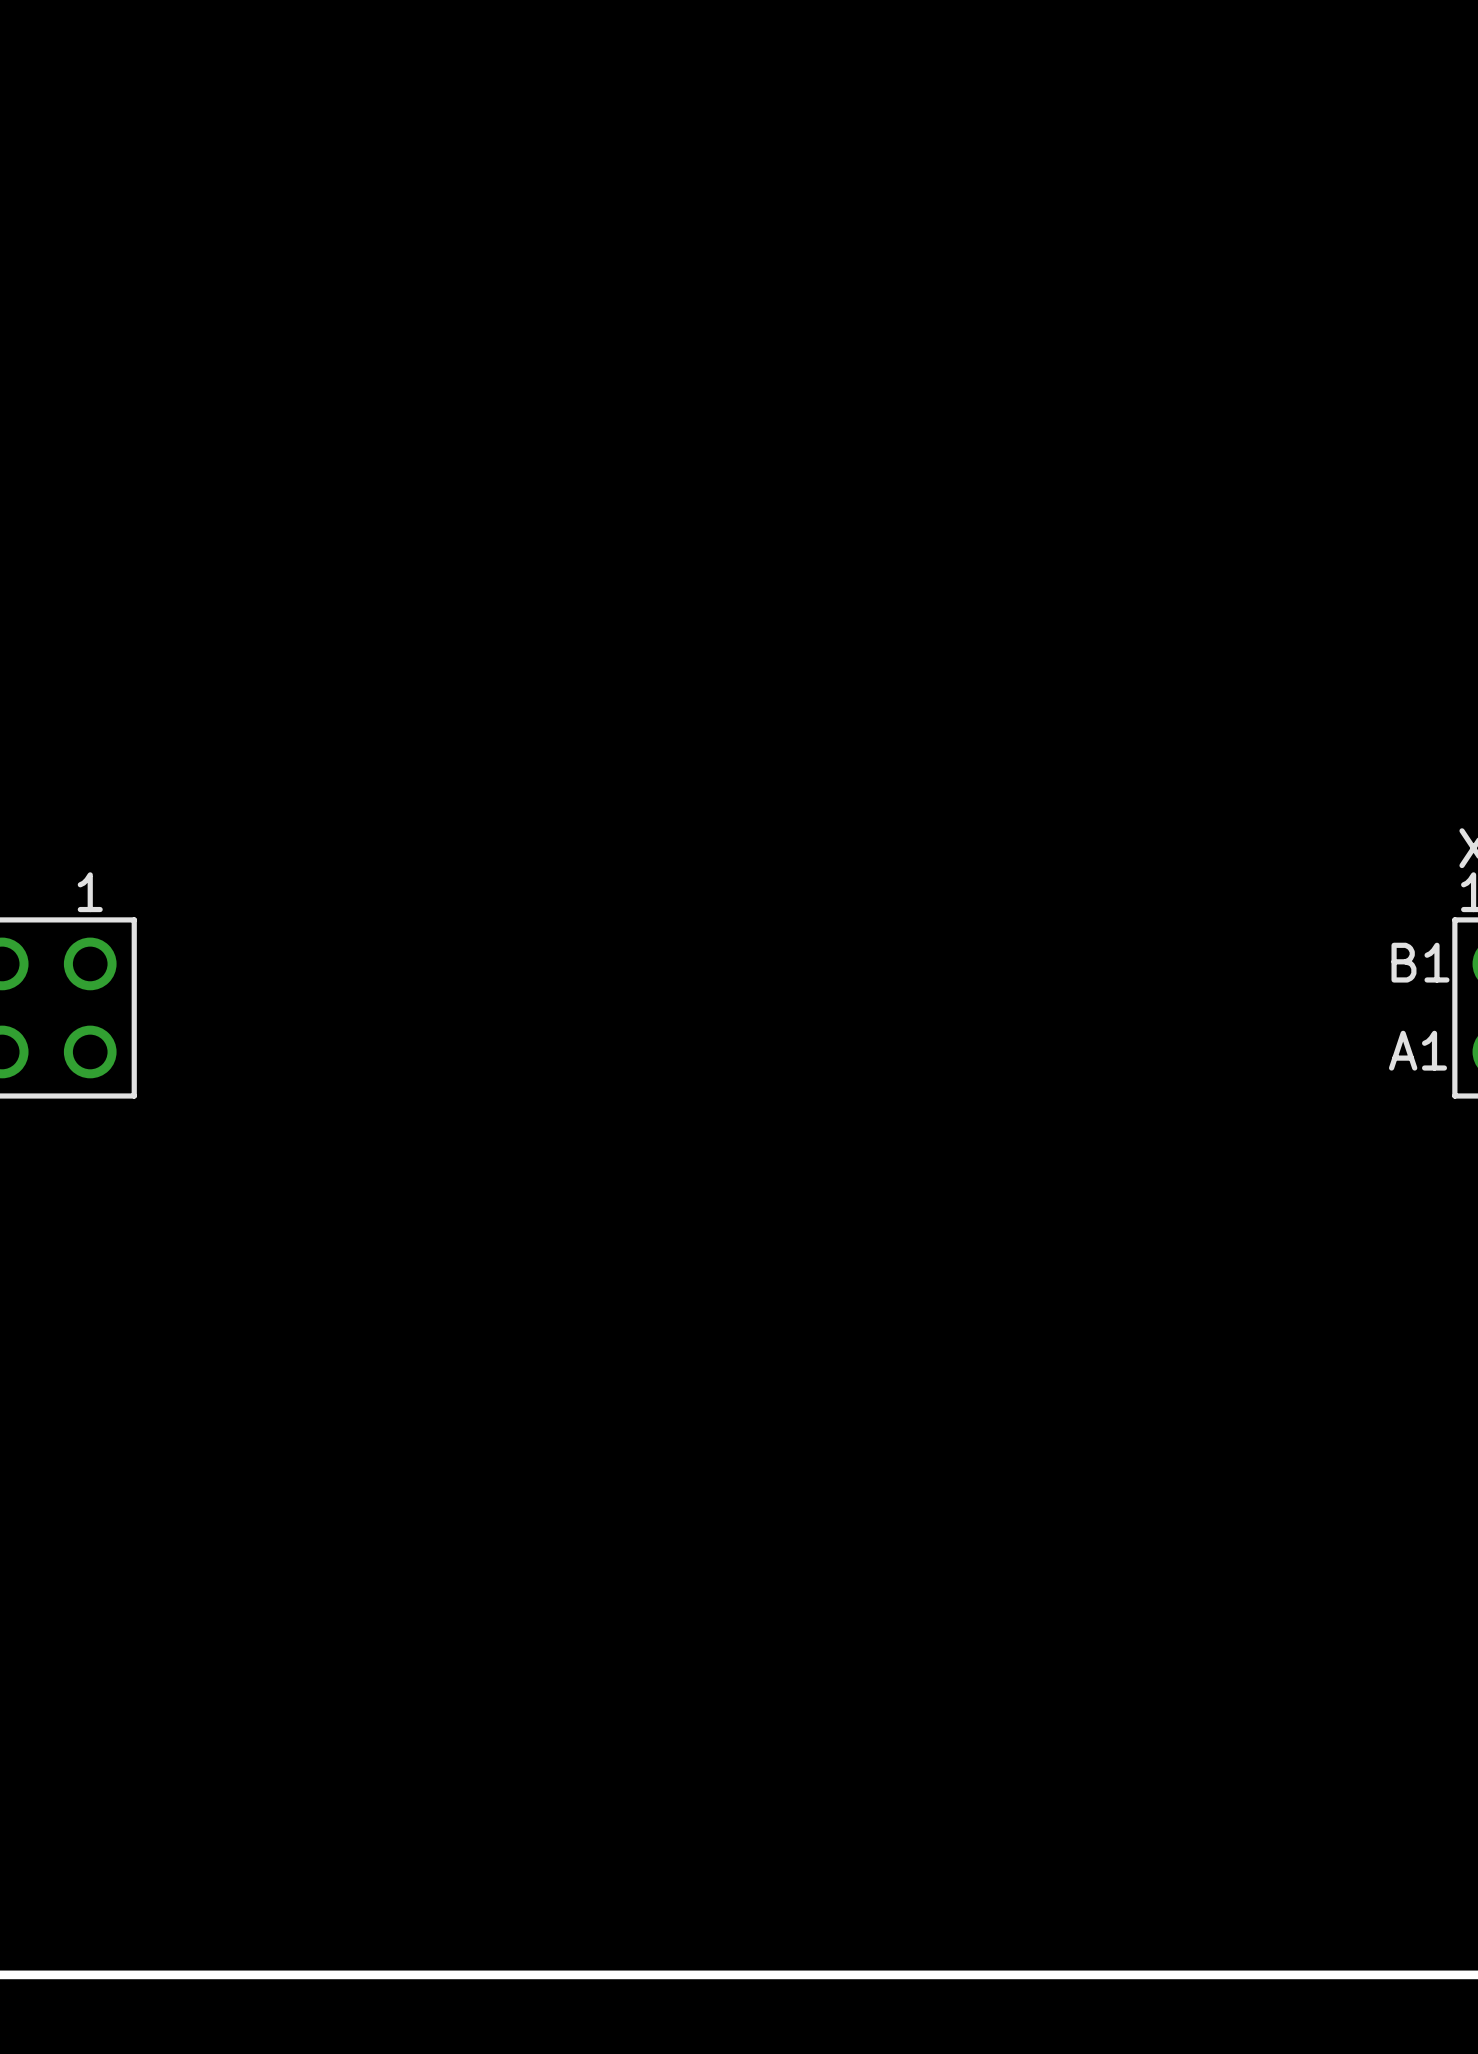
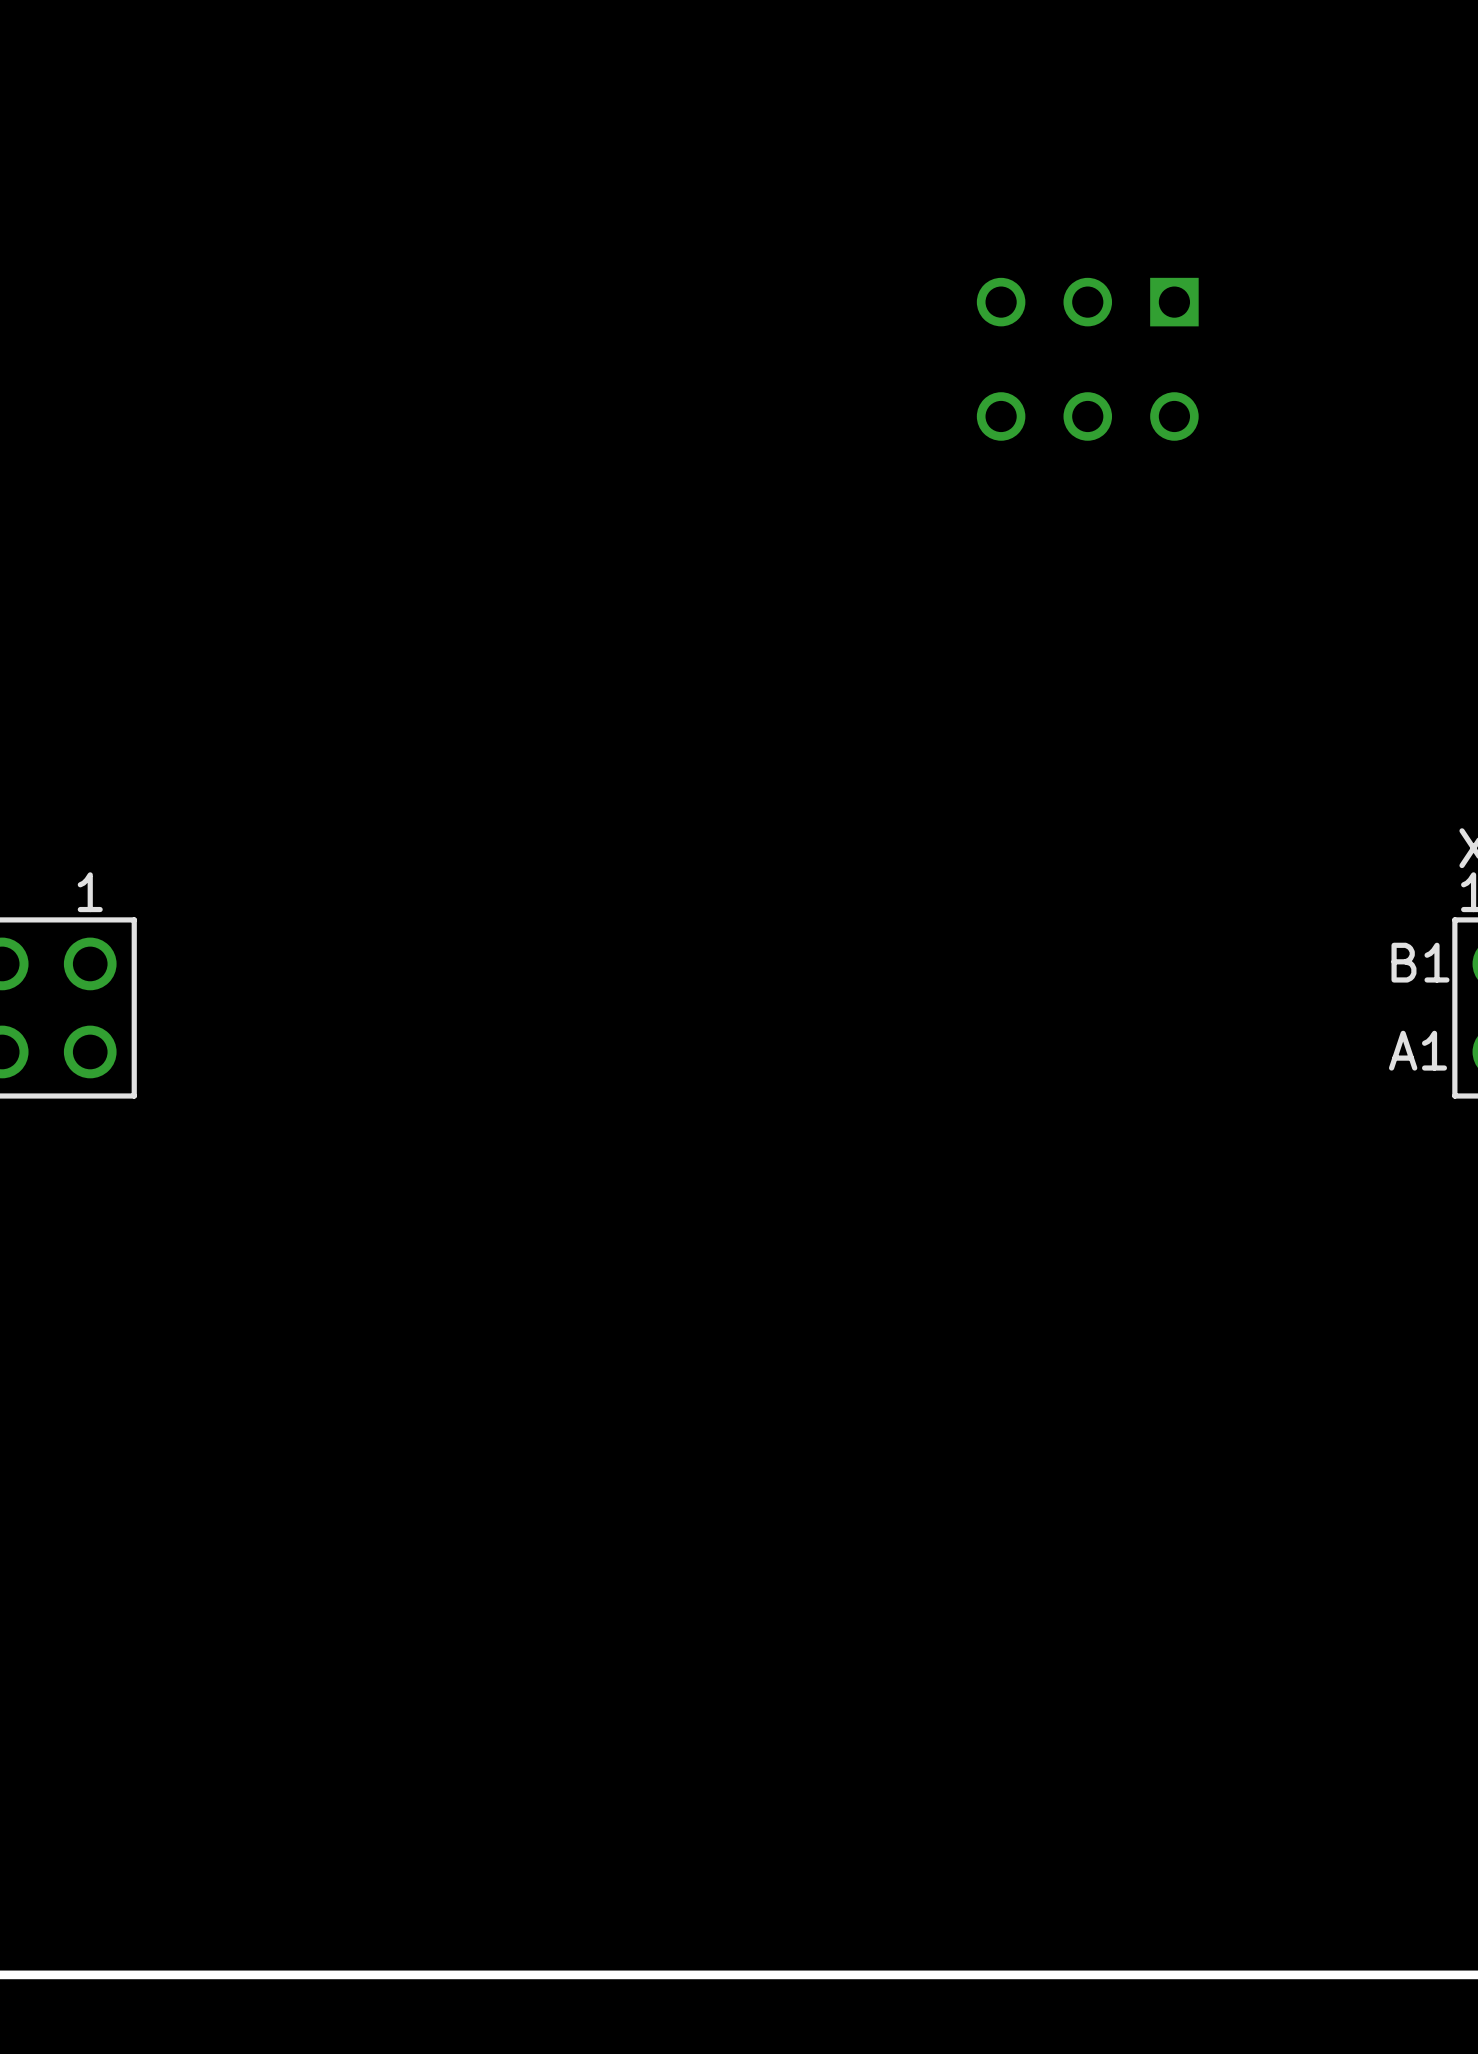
part: none -> (1087, 359)

